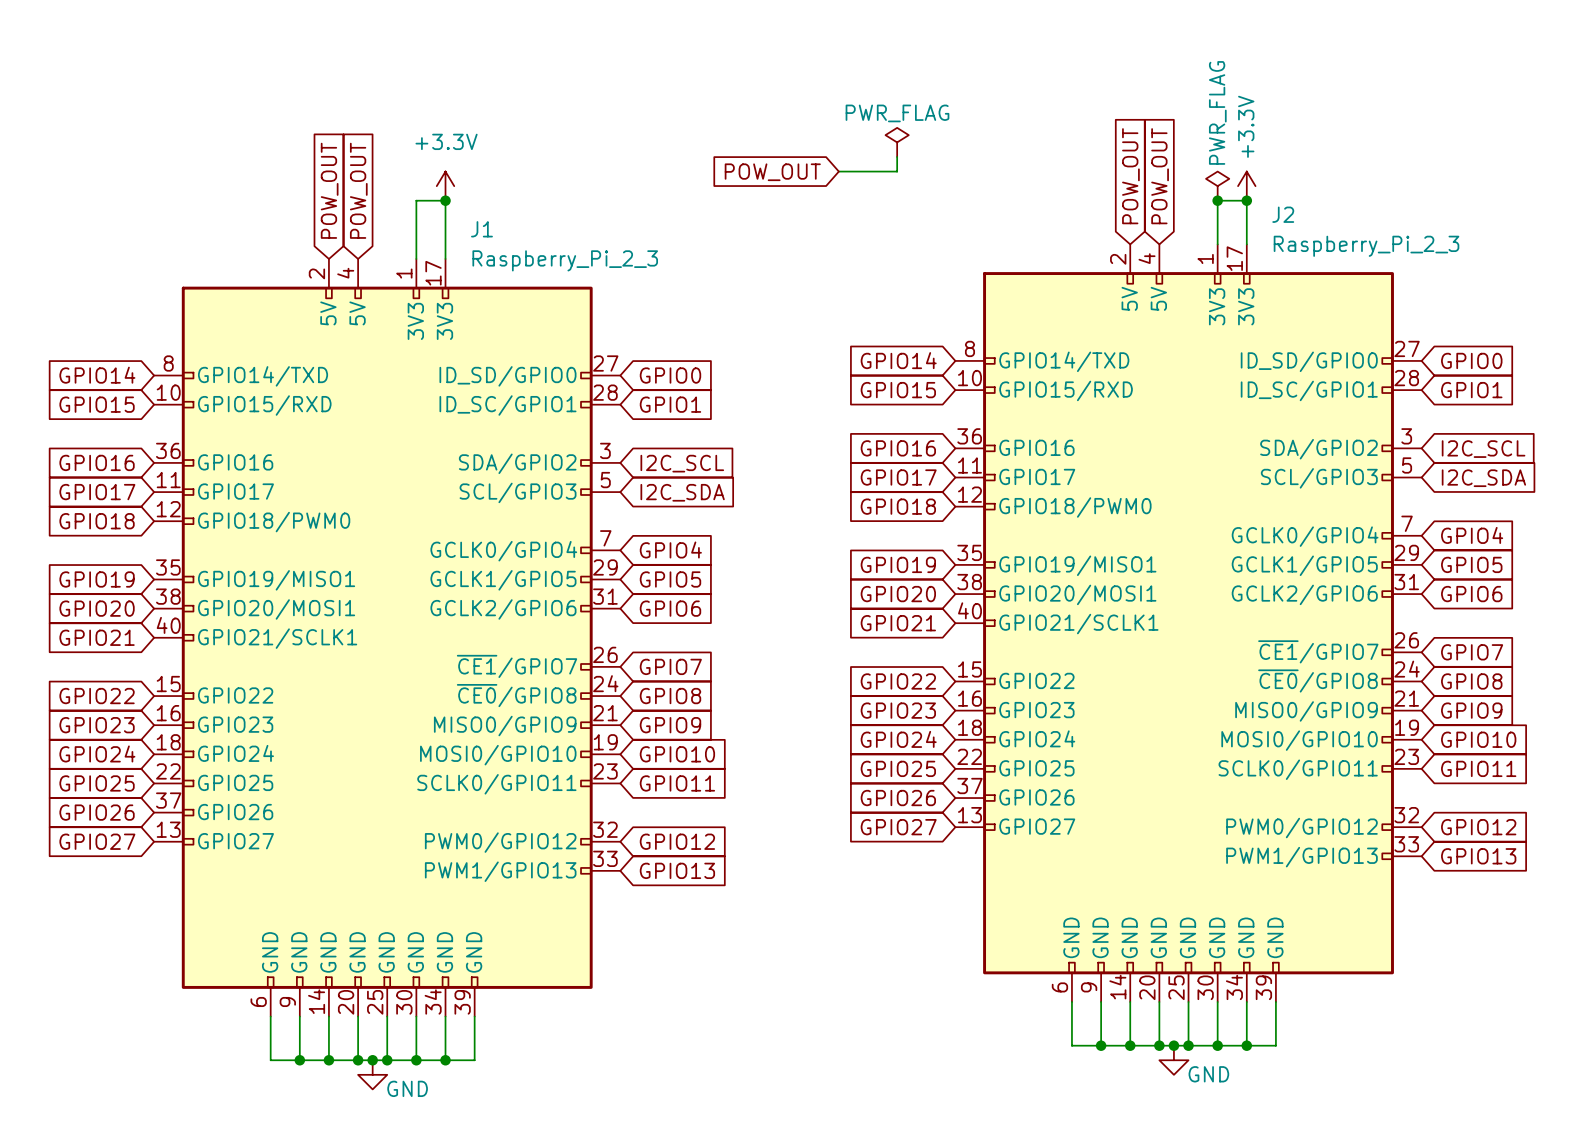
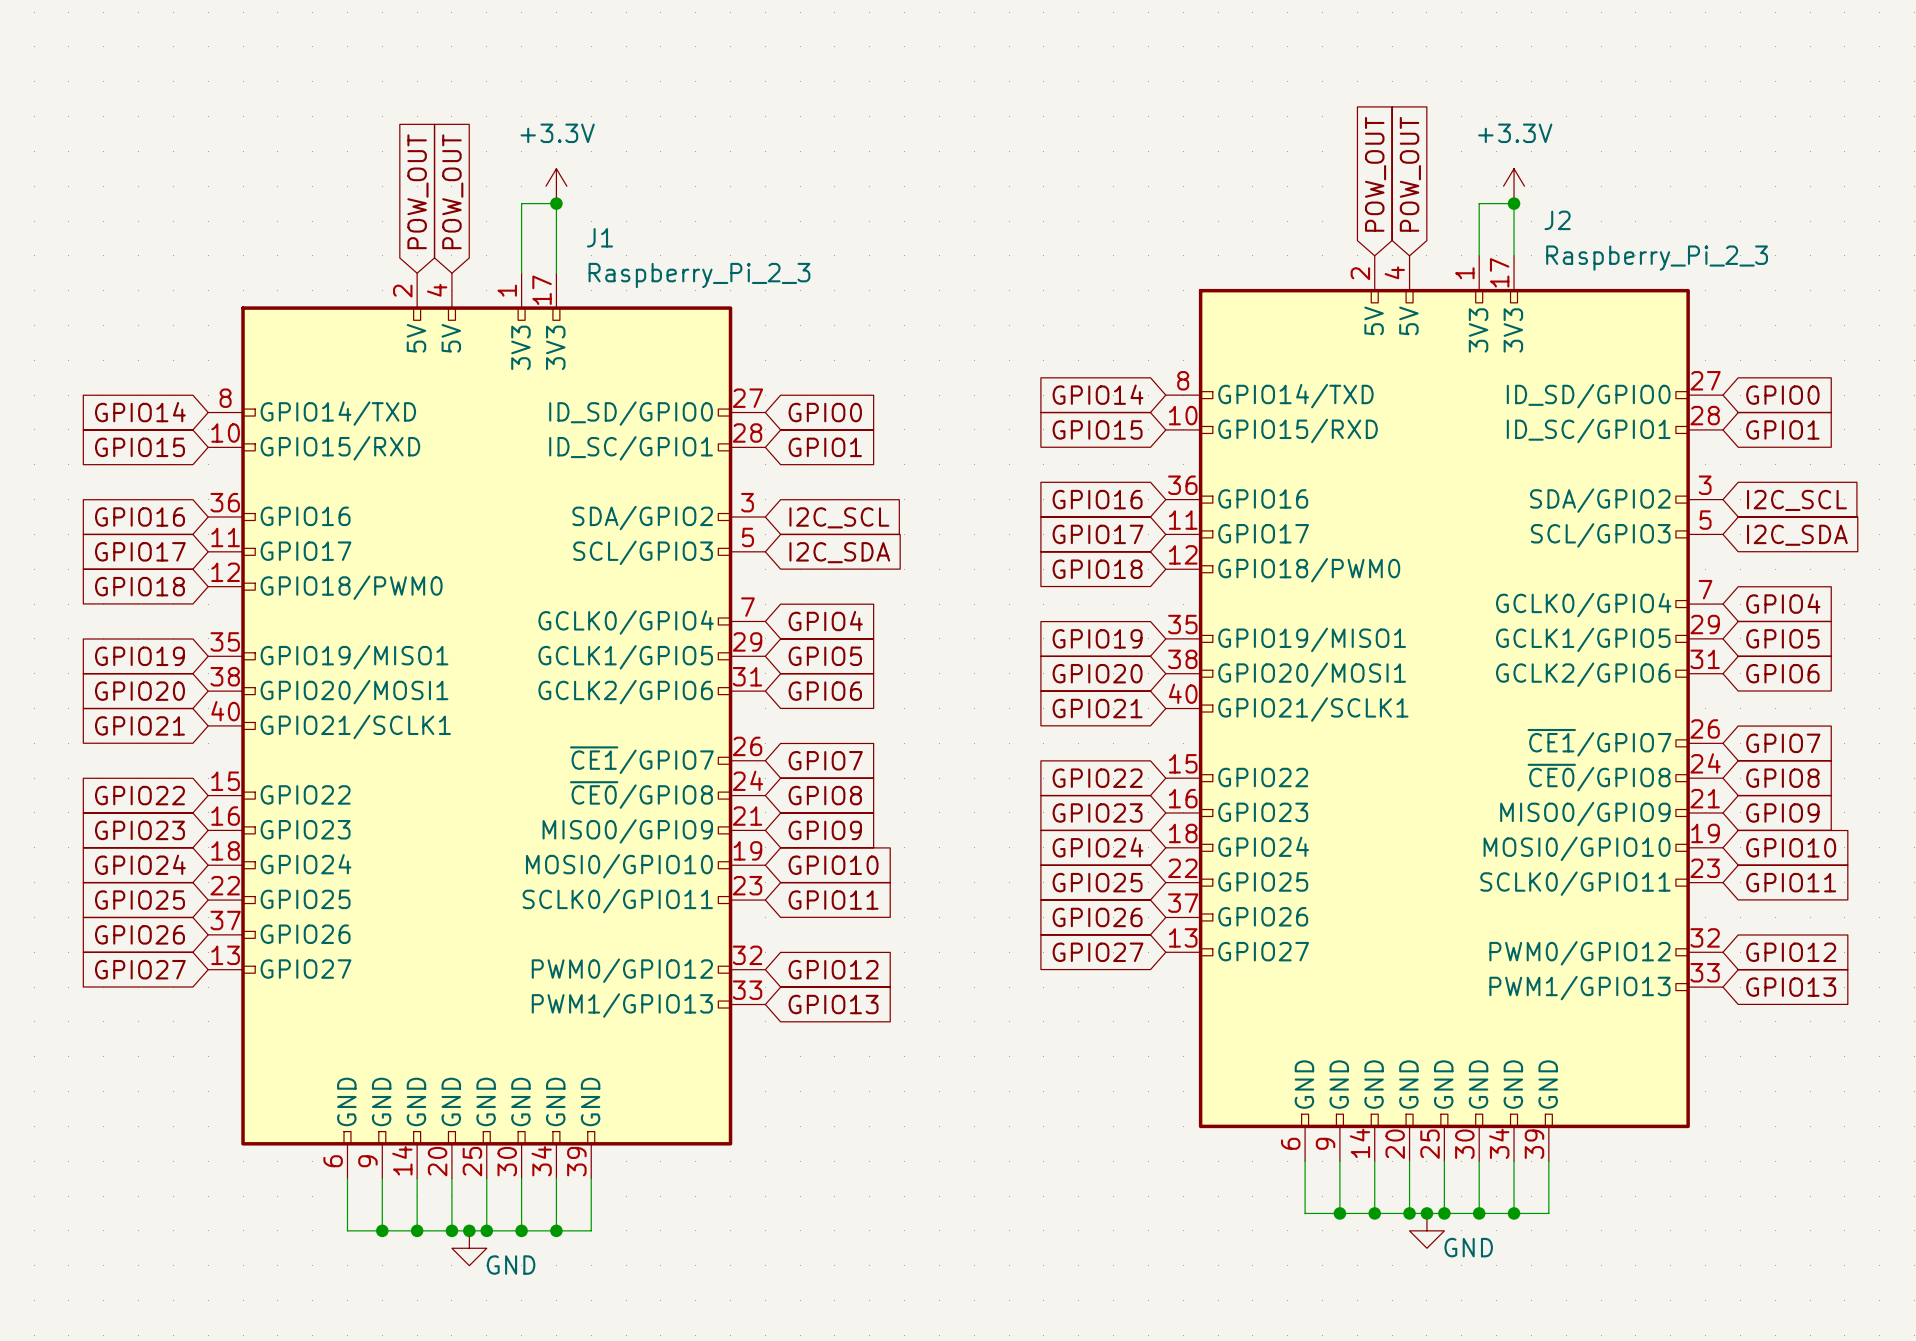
power symbol text rotation: 0° (1246, 126) -> 90° clockwise (1515, 133)
power symbol: PWR_FLAG (897, 142) -> none
wire: (897, 156) (897, 171) (838, 171) -> none
global label: POW_OUT (772, 172) -> none
power symbol: PWR_FLAG (1217, 186) -> none
junction: (1217, 200) -> none

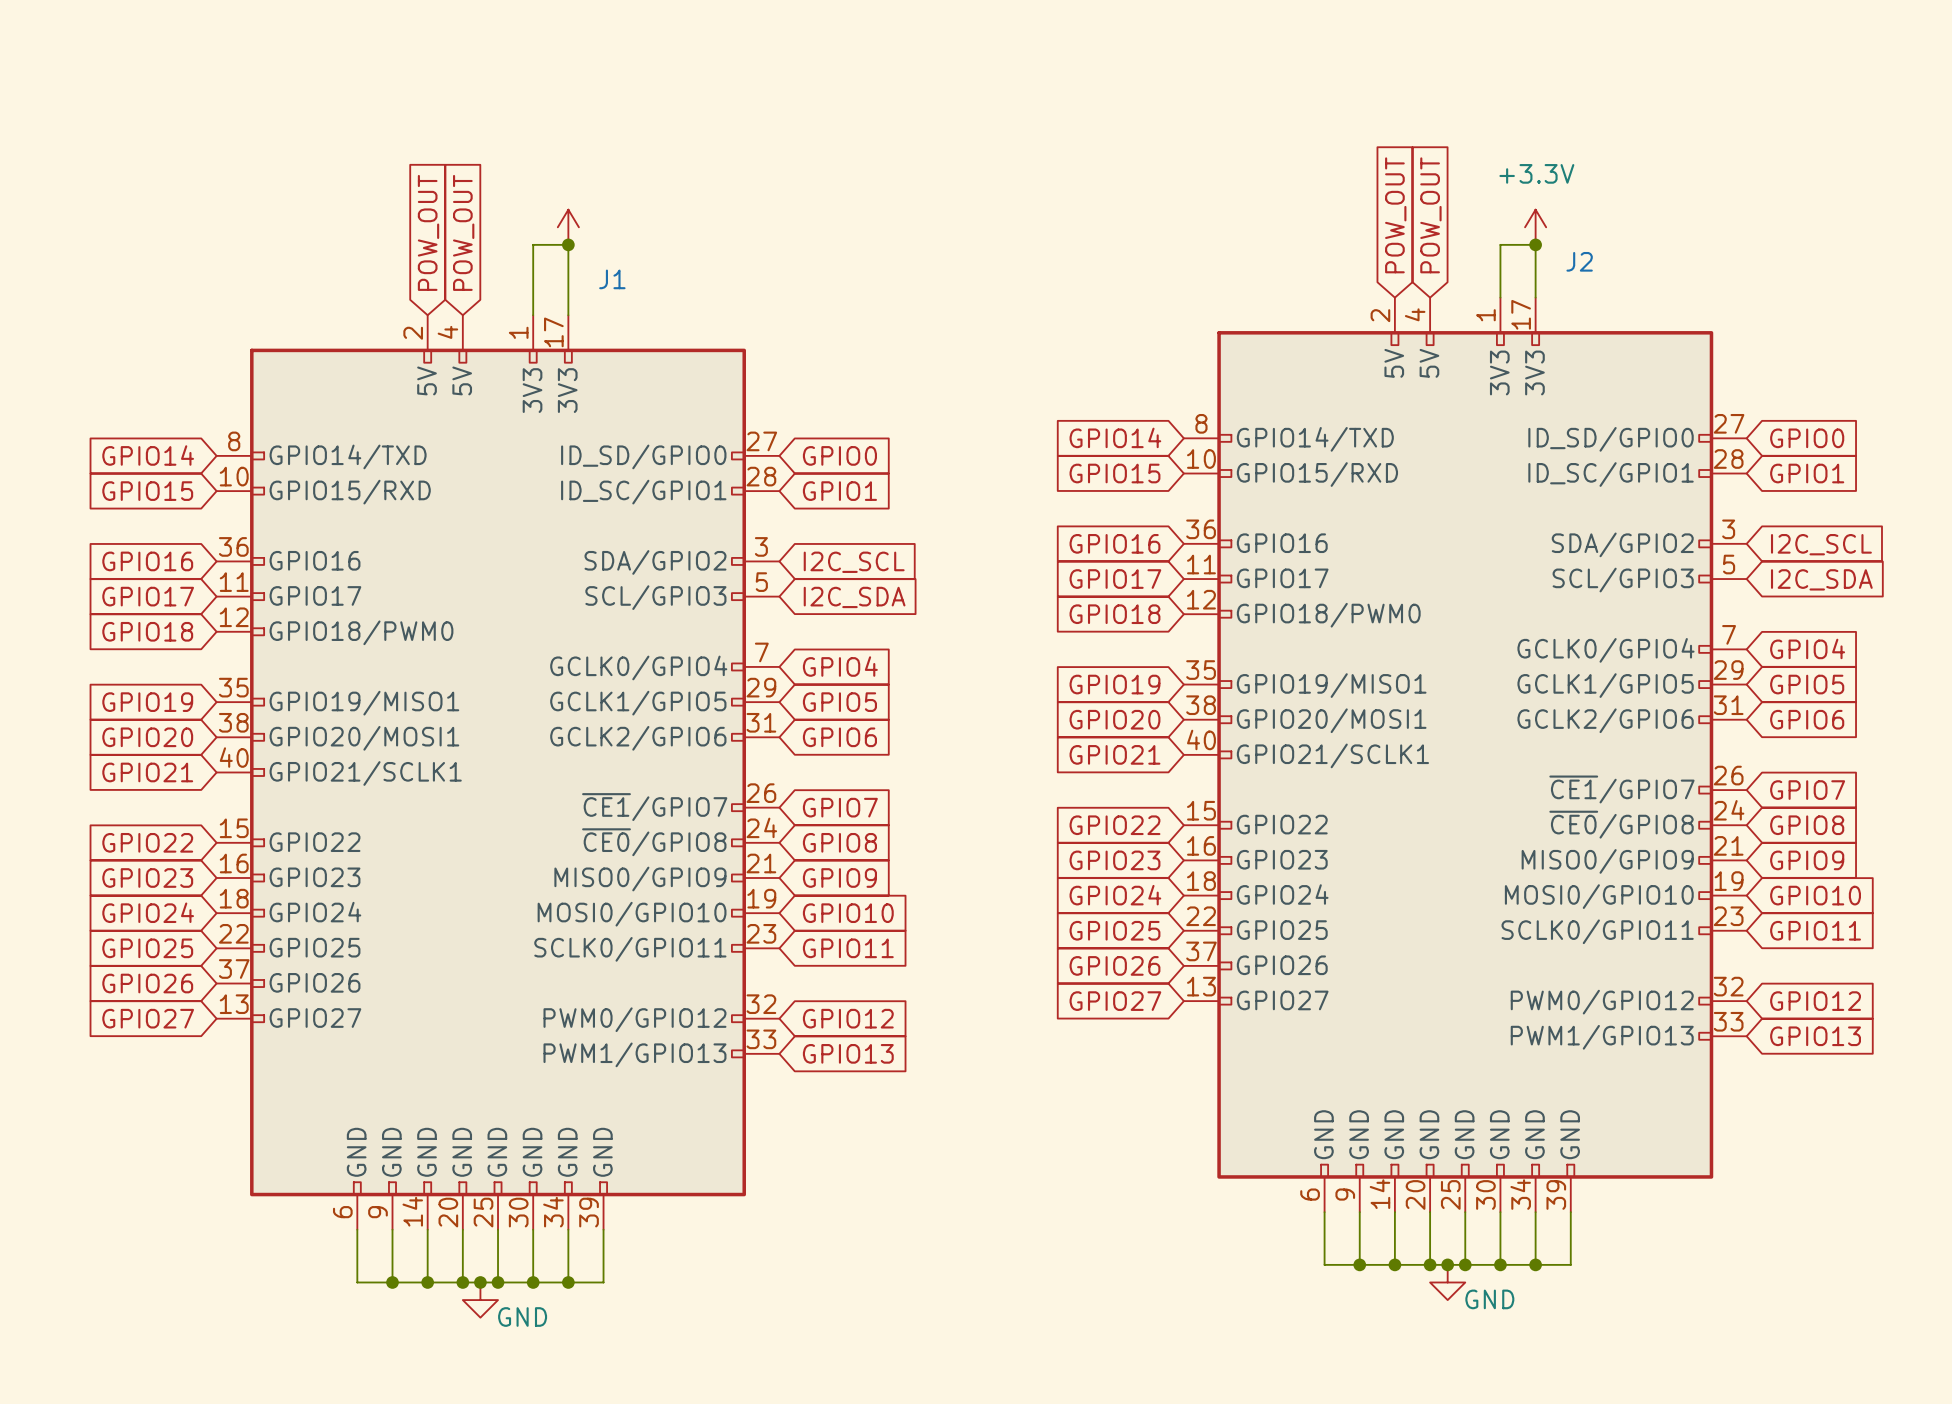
power symbol text: +3.3V (557, 133) -> none
J2 value: Raspberry_Pi_2_3 (1657, 258) -> none
J1 value: Raspberry_Pi_2_3 (699, 275) -> none

